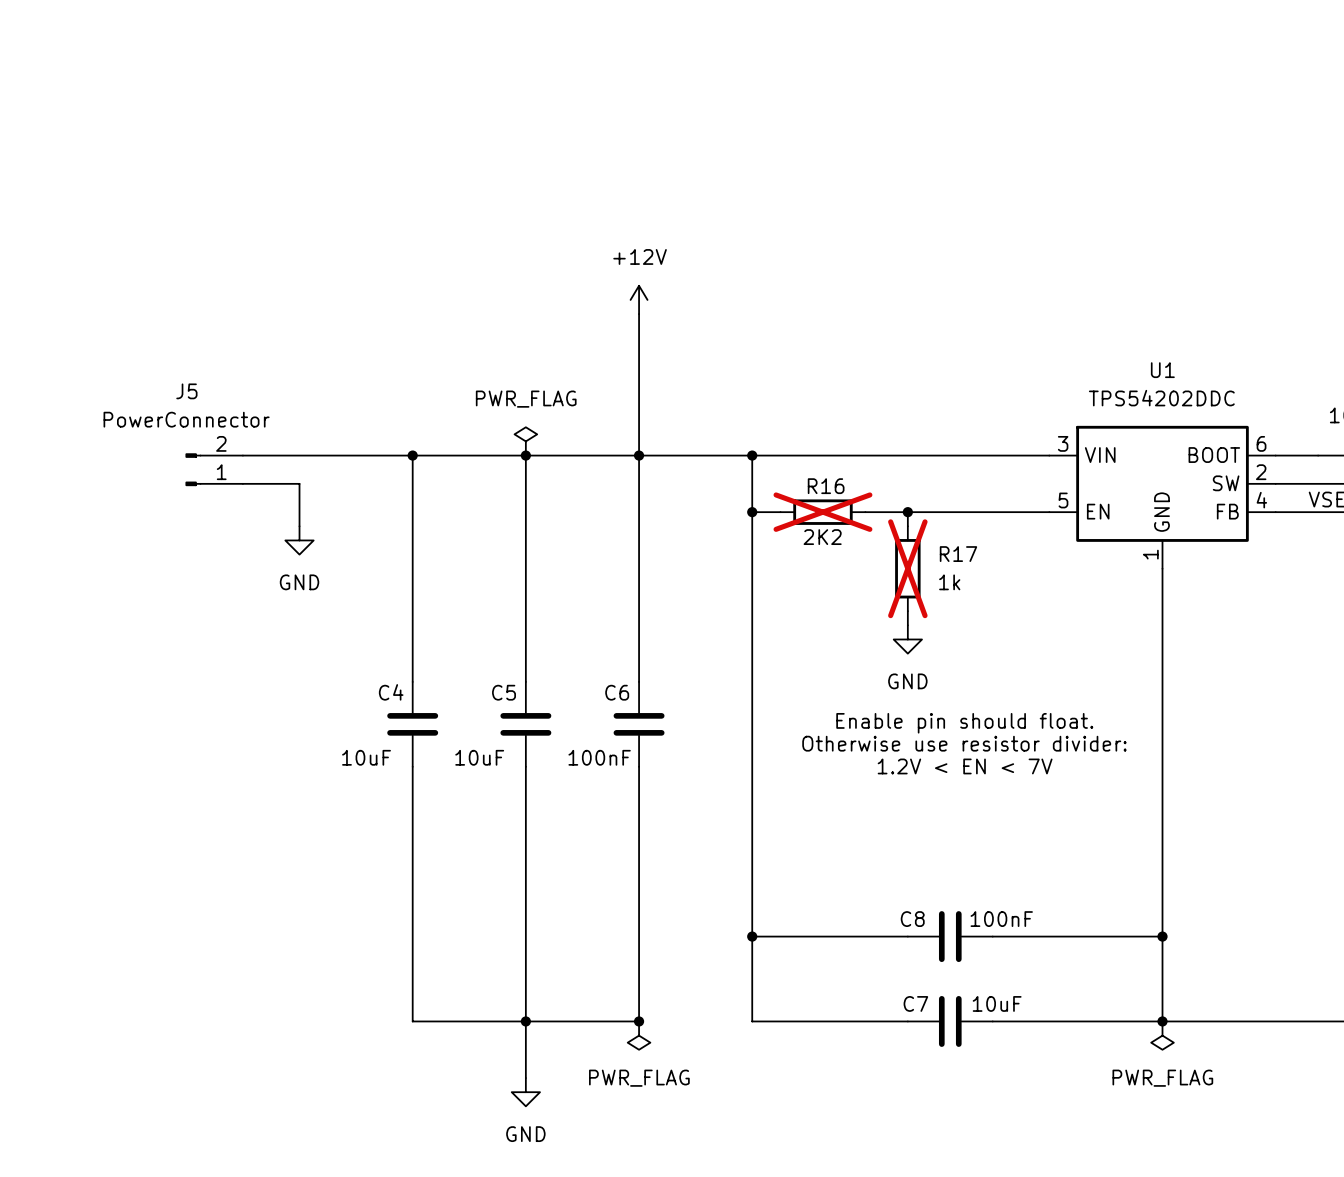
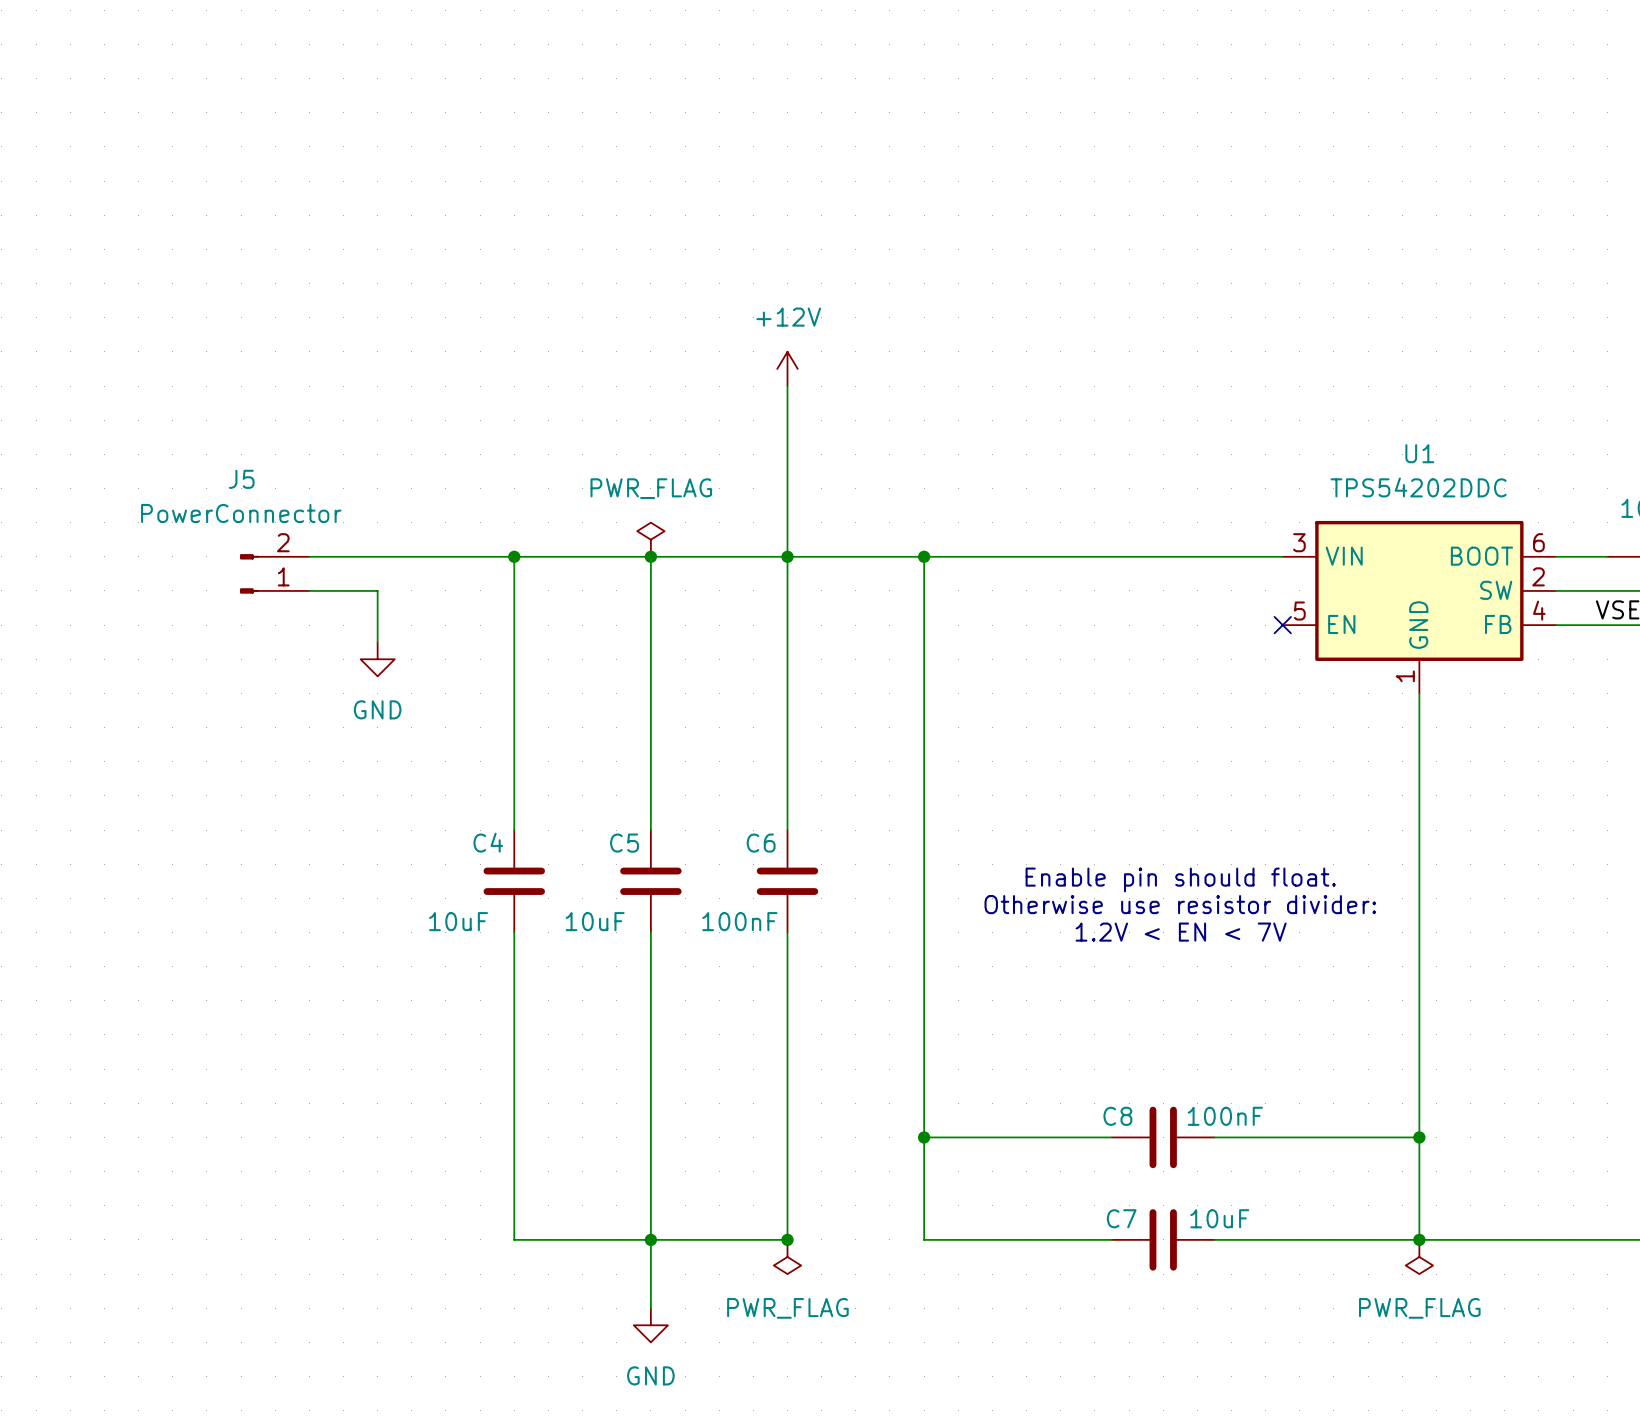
wire: (752, 512) (780, 512) -> none
junction: (752, 512) -> none
R16: 2K2 (822, 512) -> none
wire: (865, 512) (1049, 512) -> none
wire: (907, 512) (907, 526) -> none
junction: (907, 512) -> none
no-connect mark: none -> (1282, 625)
R17: 1k (907, 568) -> none
wire: (907, 611) (907, 625) -> none
power symbol: GND (907, 639) -> none

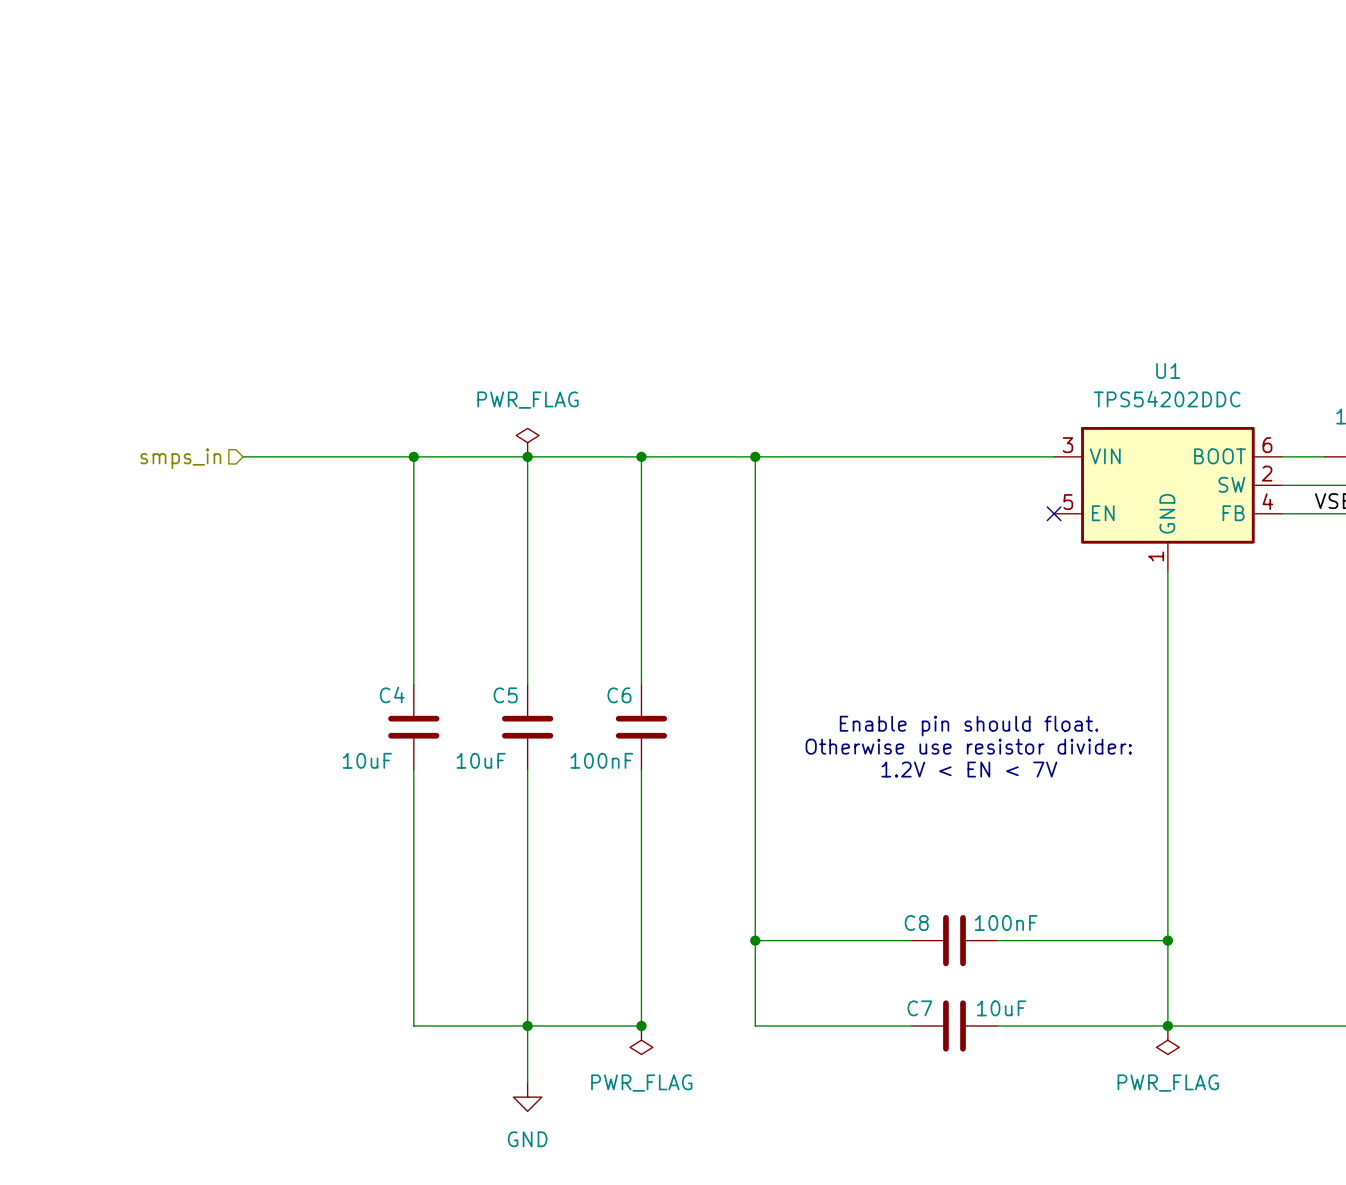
power symbol: +12V (787, 368) -> none
wire: (787, 386) (787, 556) -> none
hierarchical label: none -> smps_in (180, 458)
J5: PowerConnector (274, 573) -> none
wire: (309, 590) (377, 590) (377, 642) -> none
power symbol: GND (377, 659) -> none

